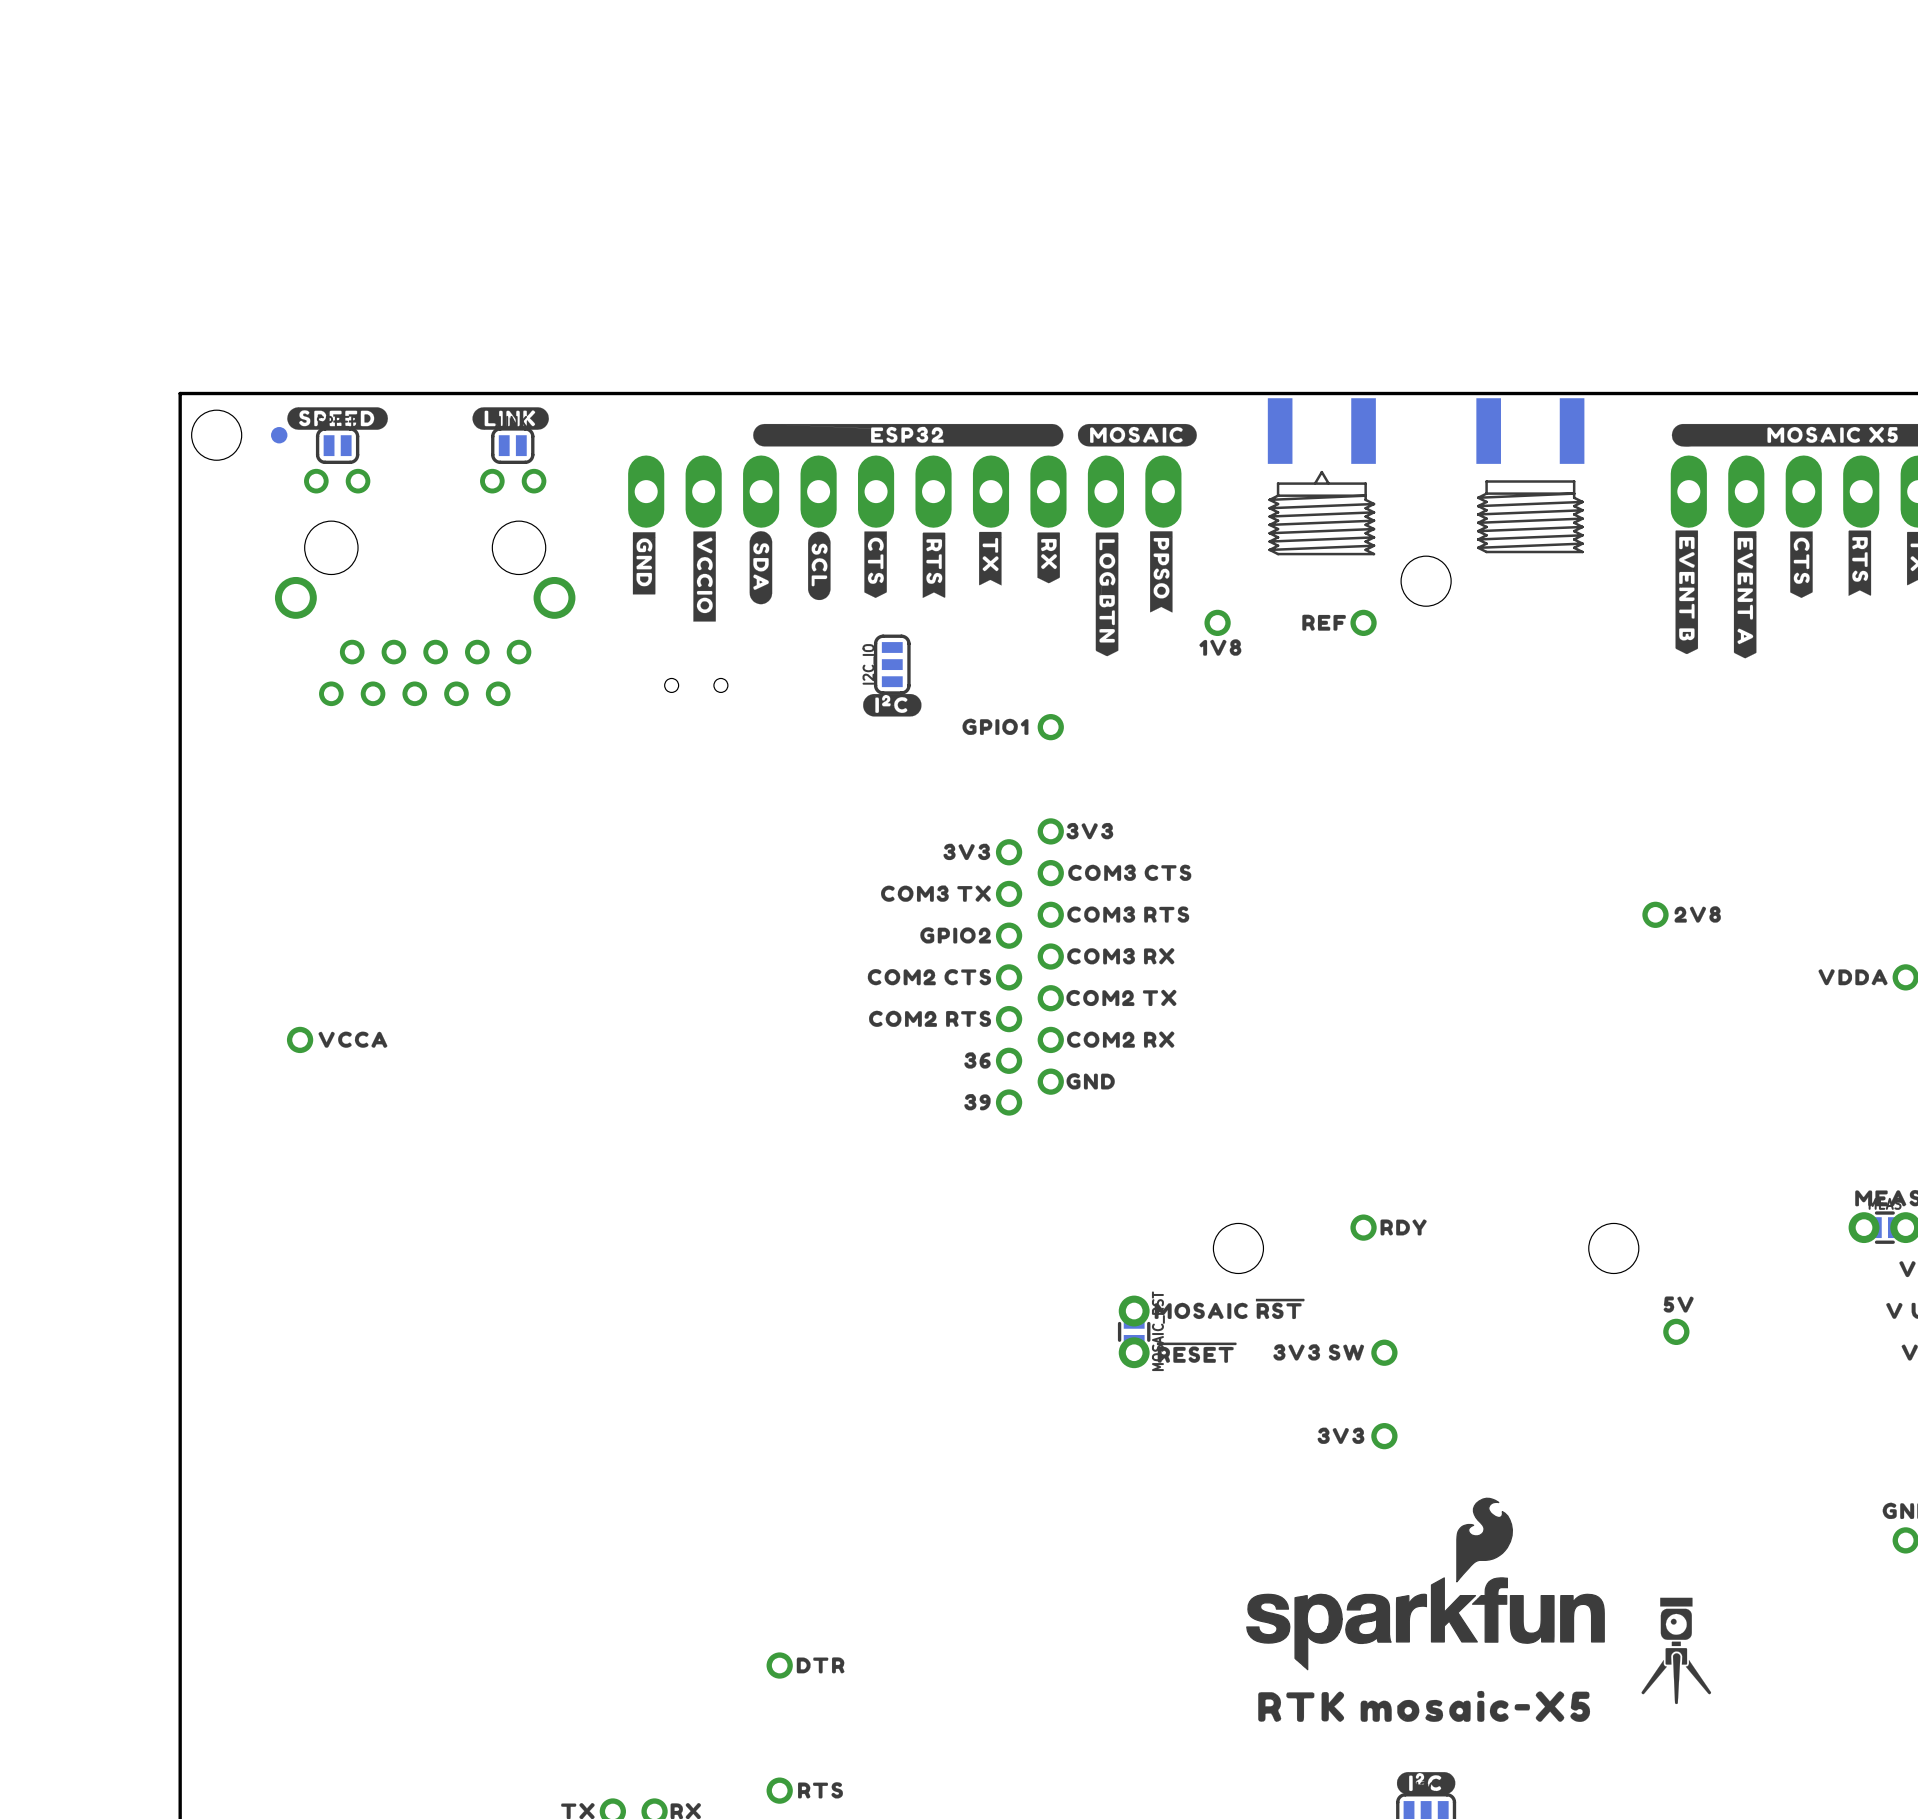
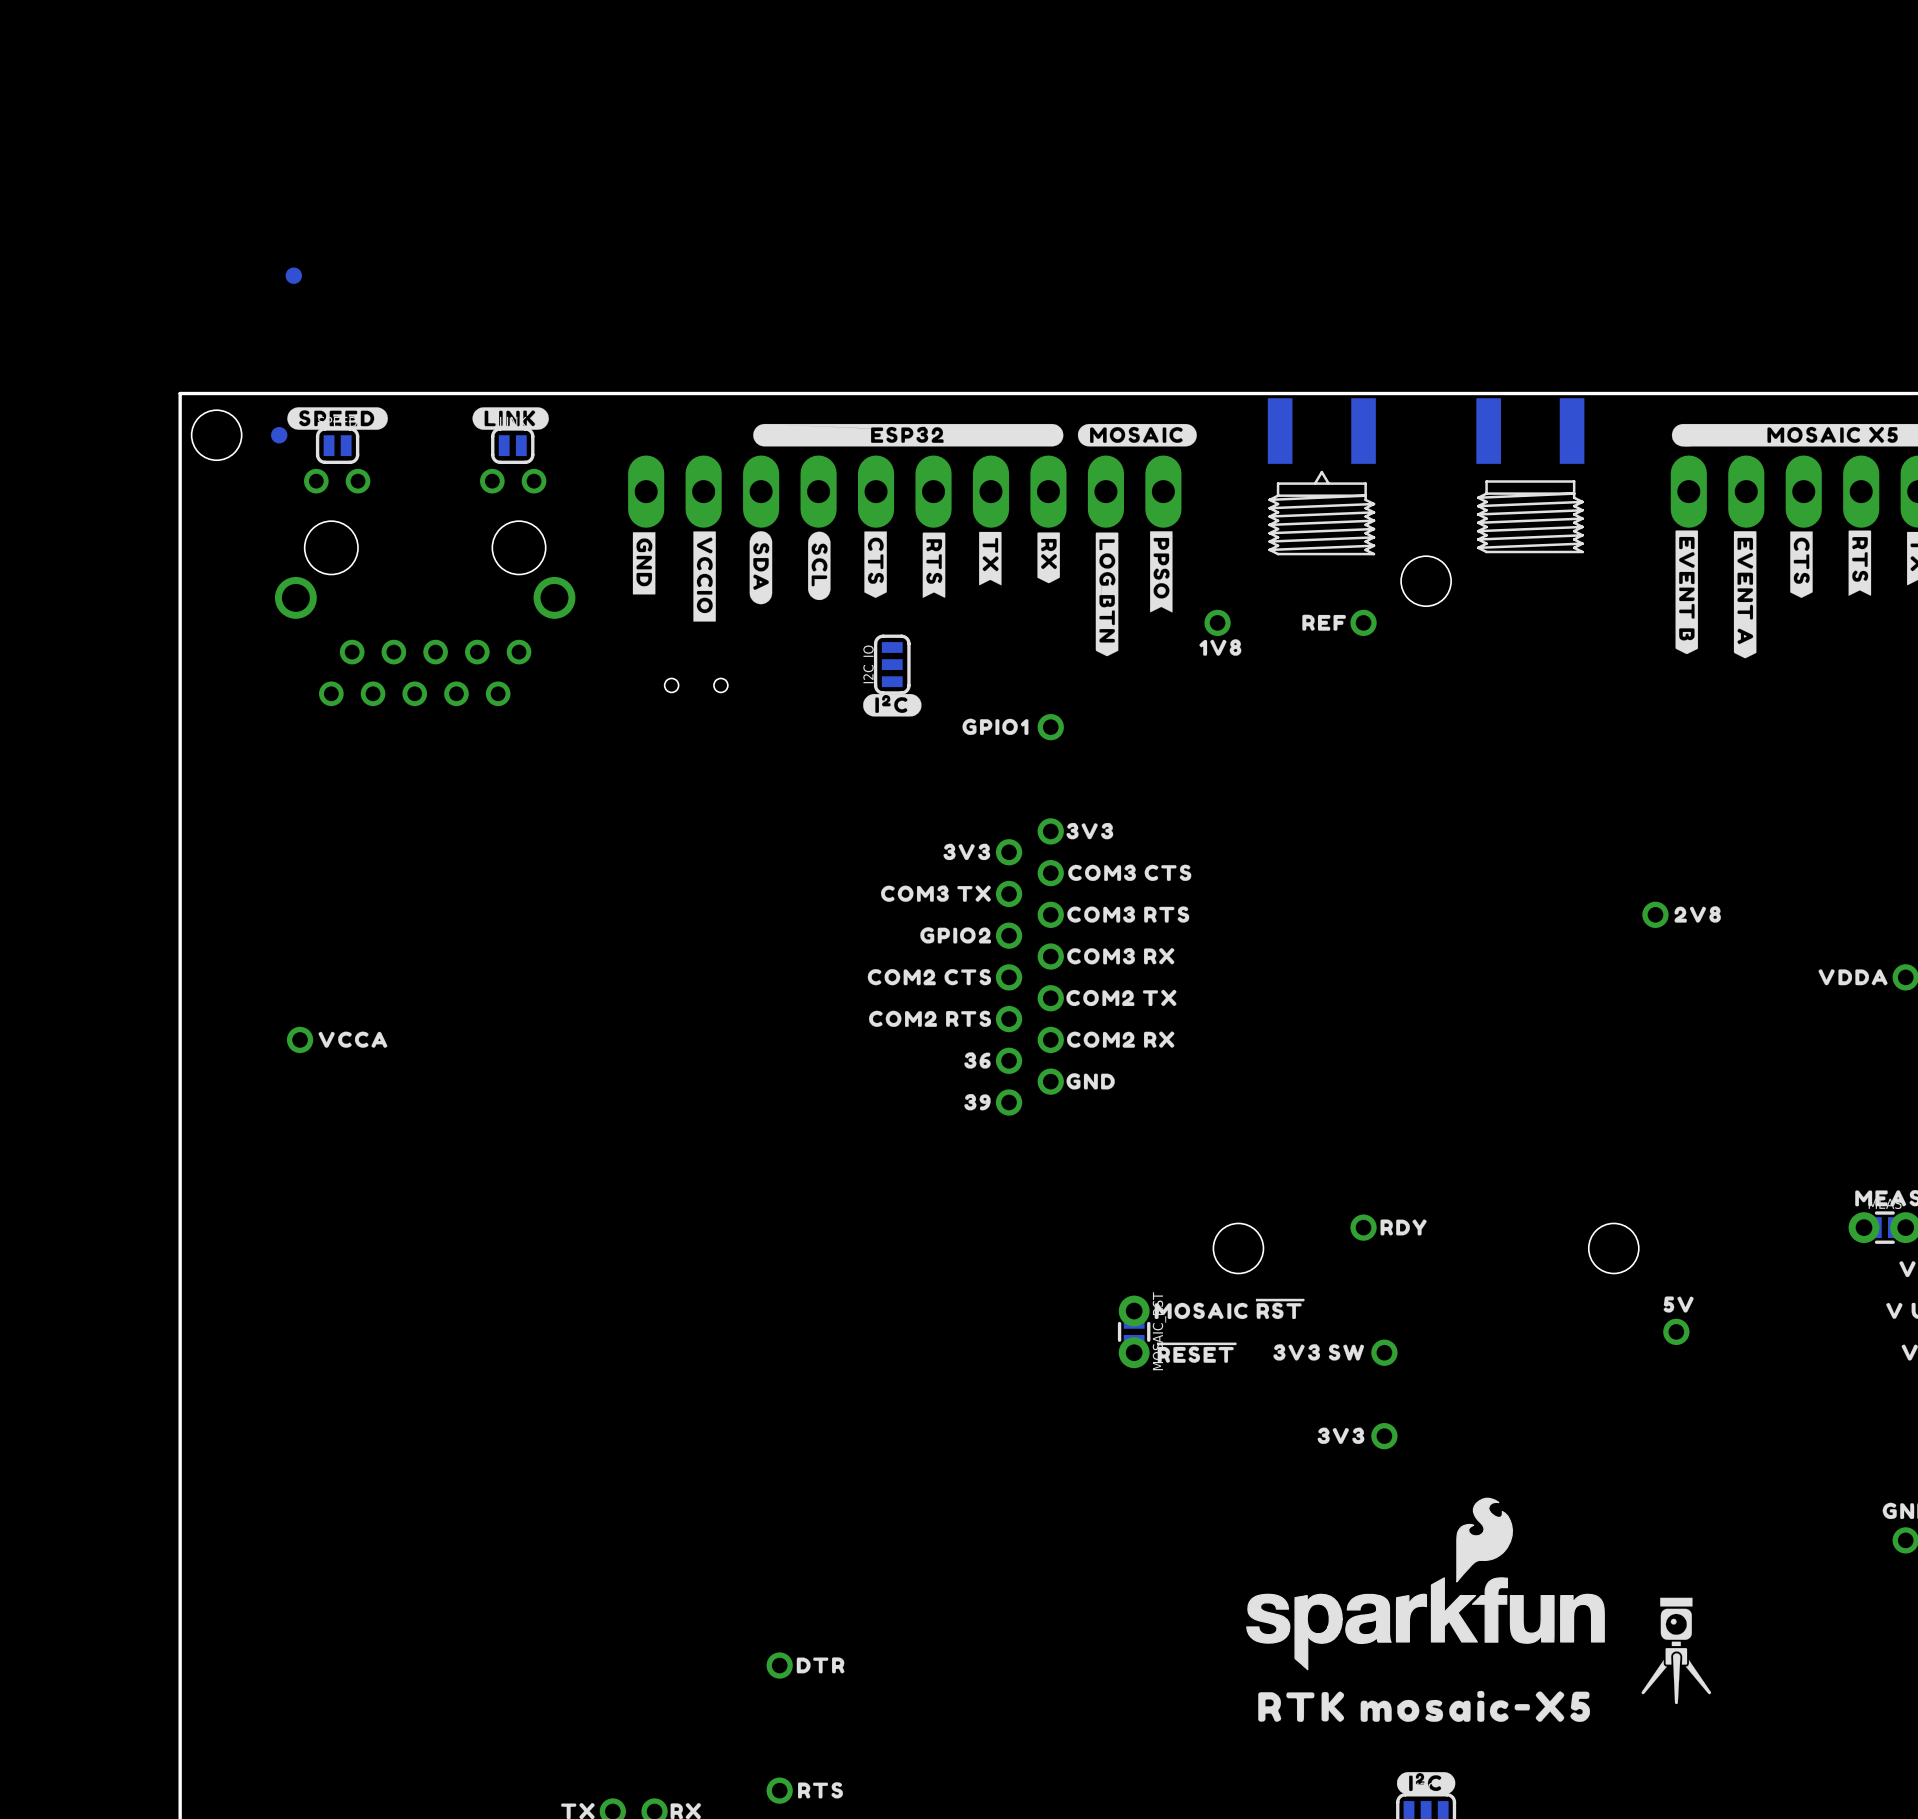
part: none -> (293, 275)

